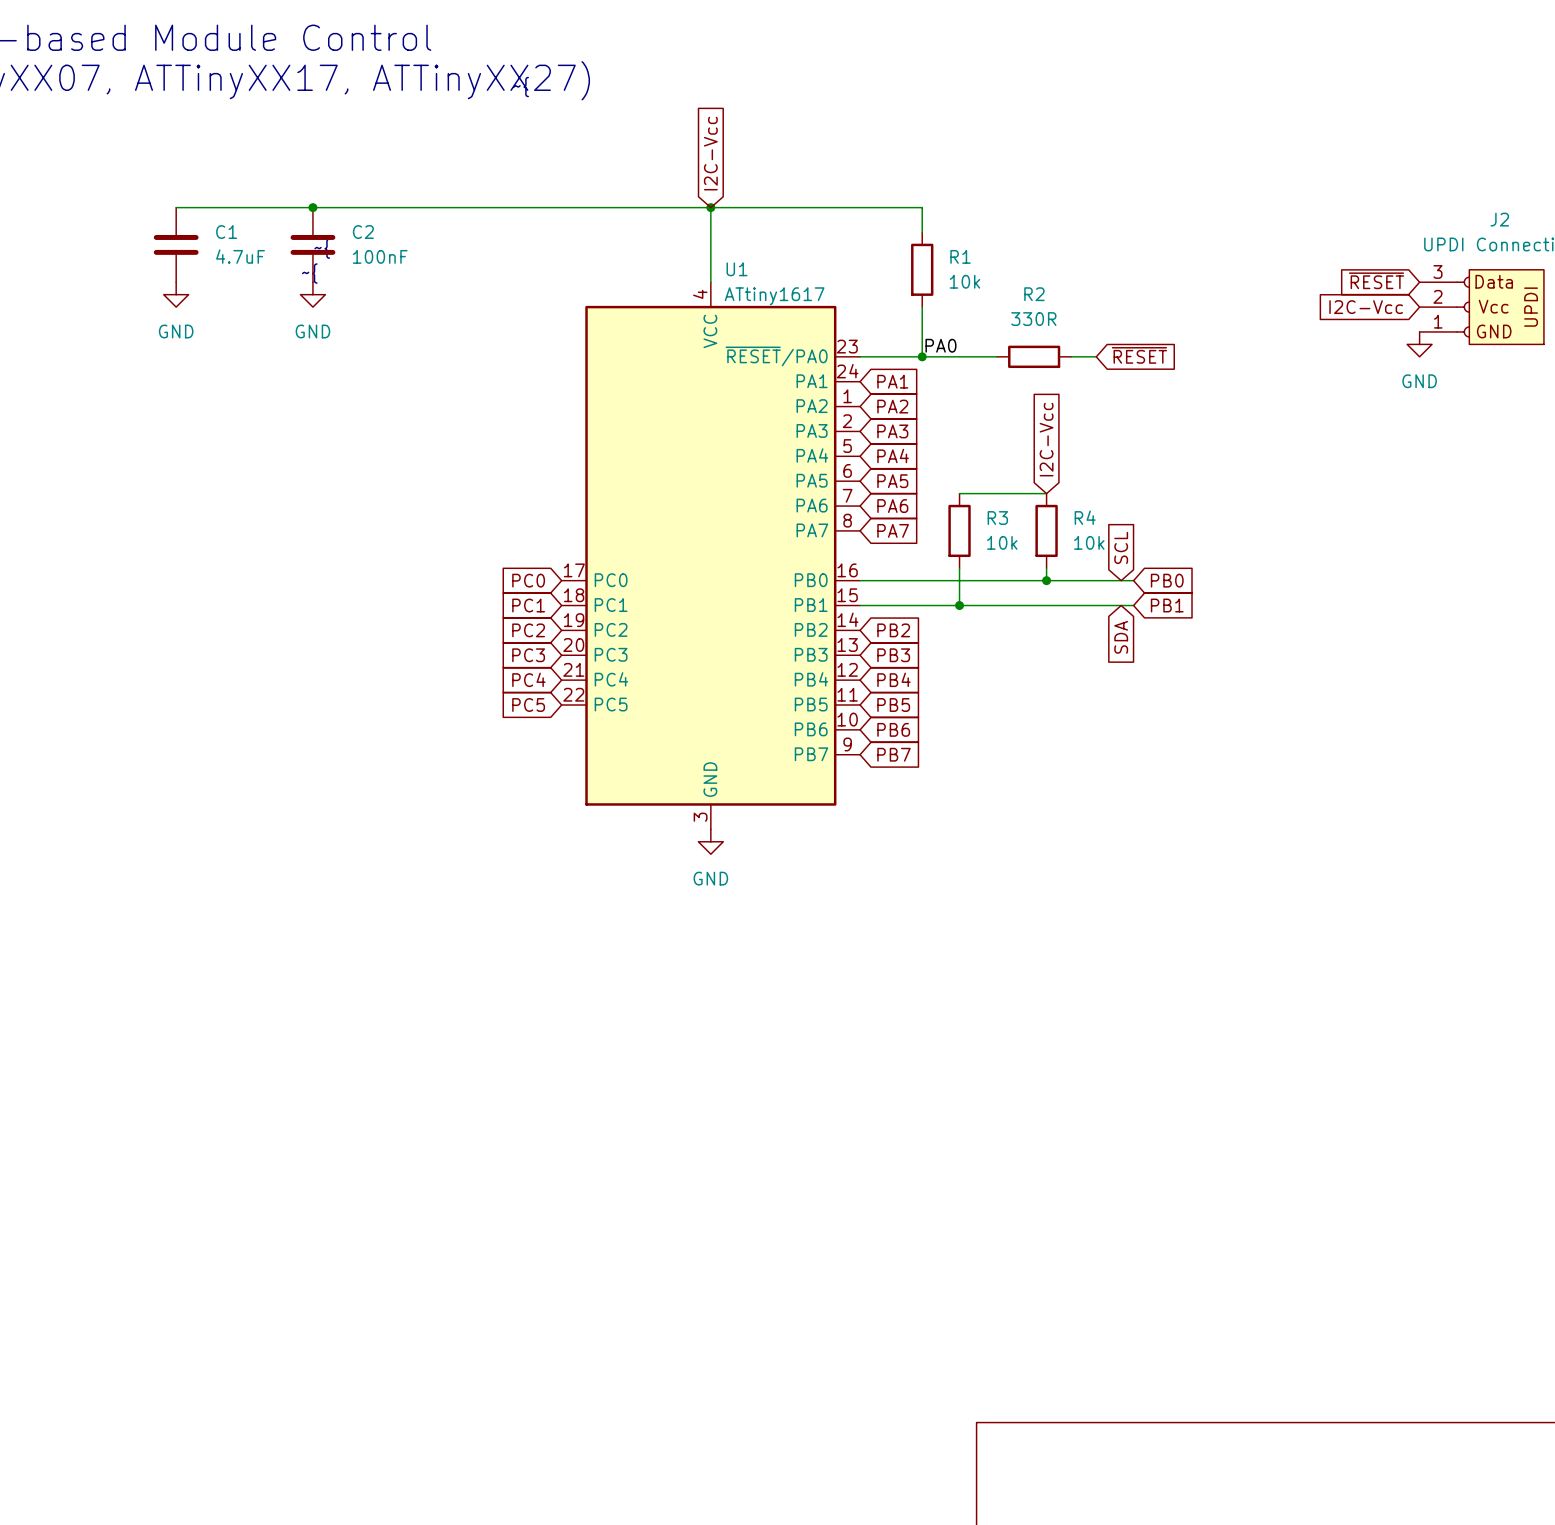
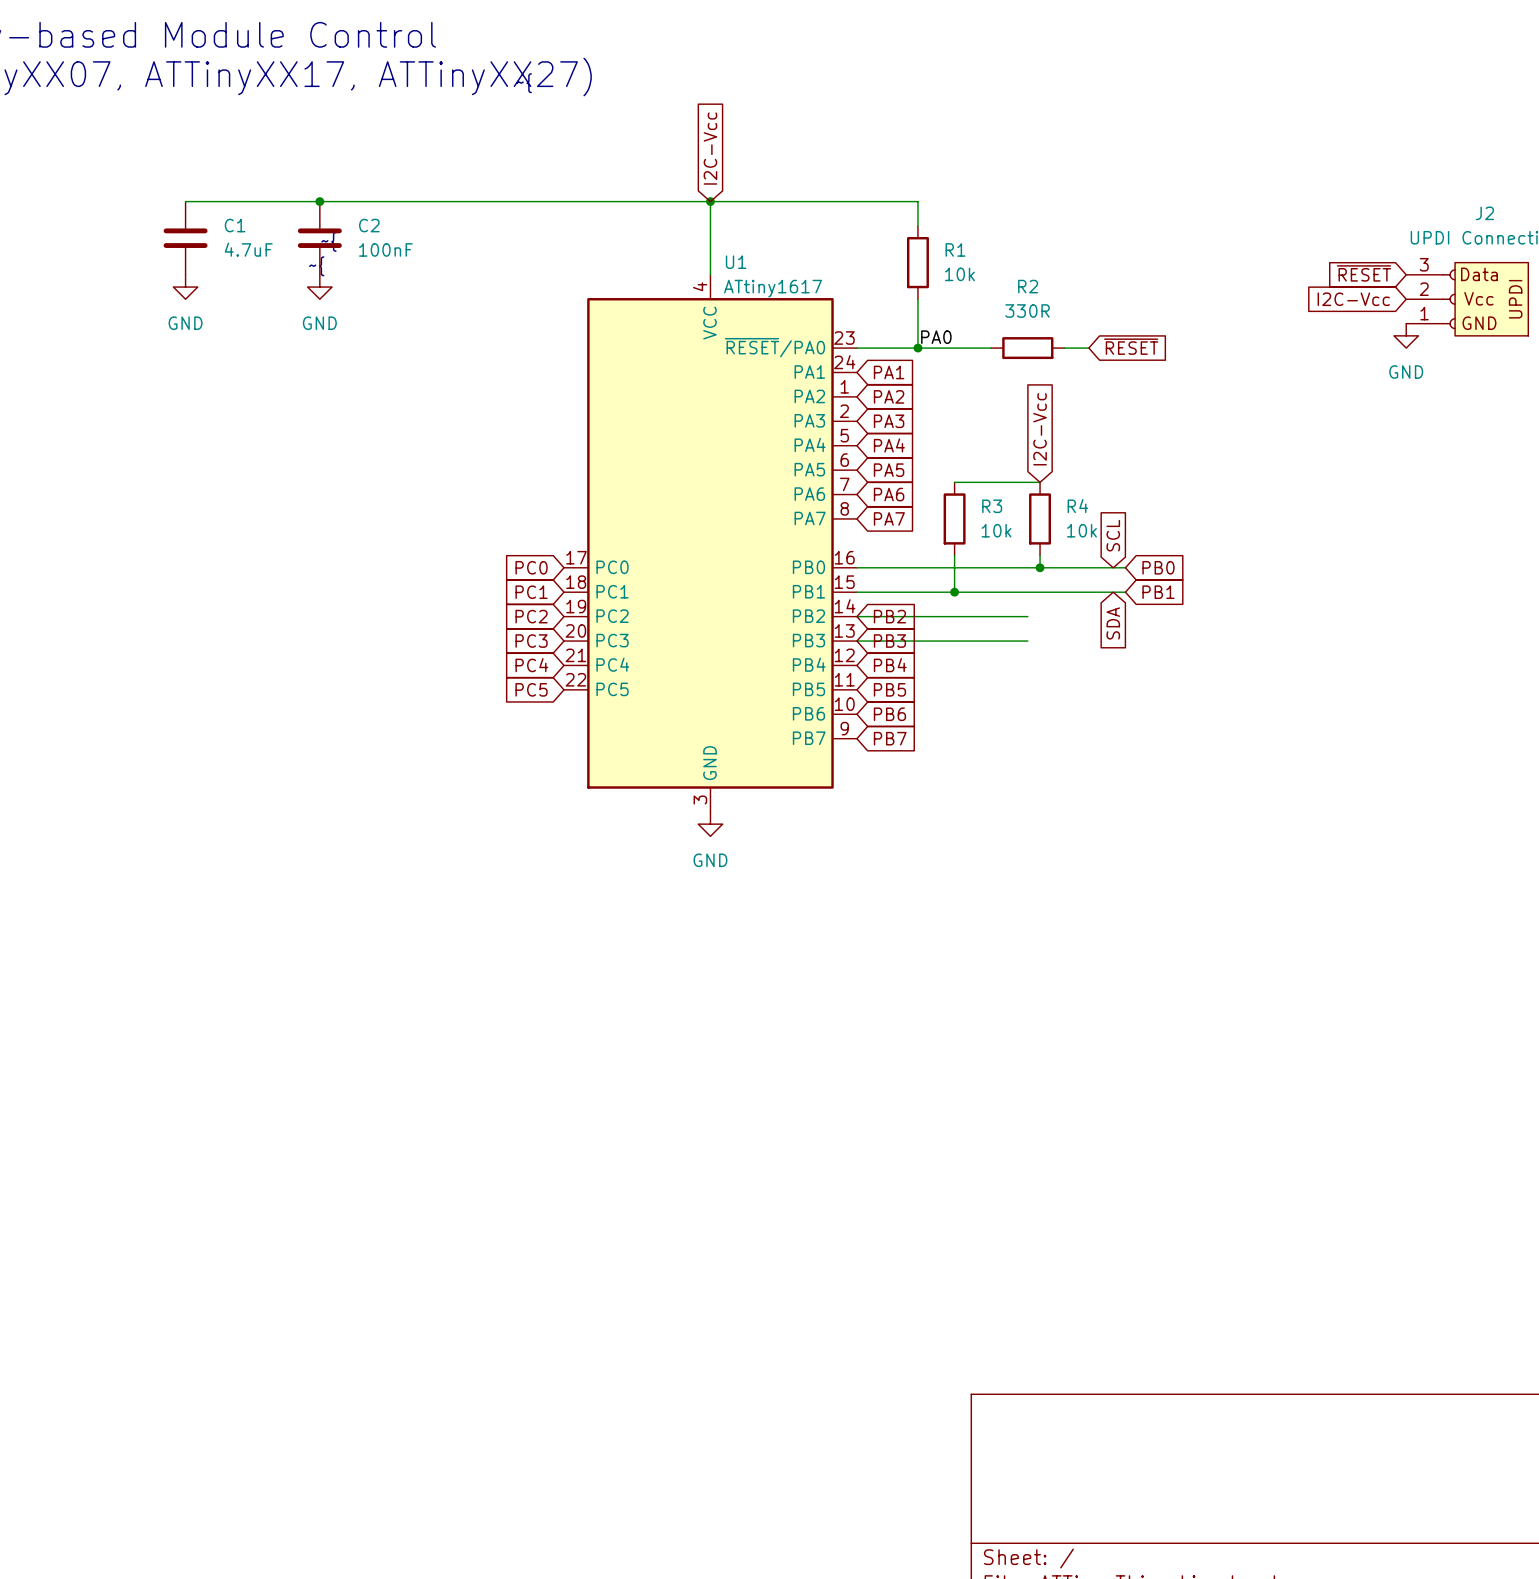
wire: none -> (856, 616) (1027, 616)
wire: none -> (856, 641) (1027, 641)

